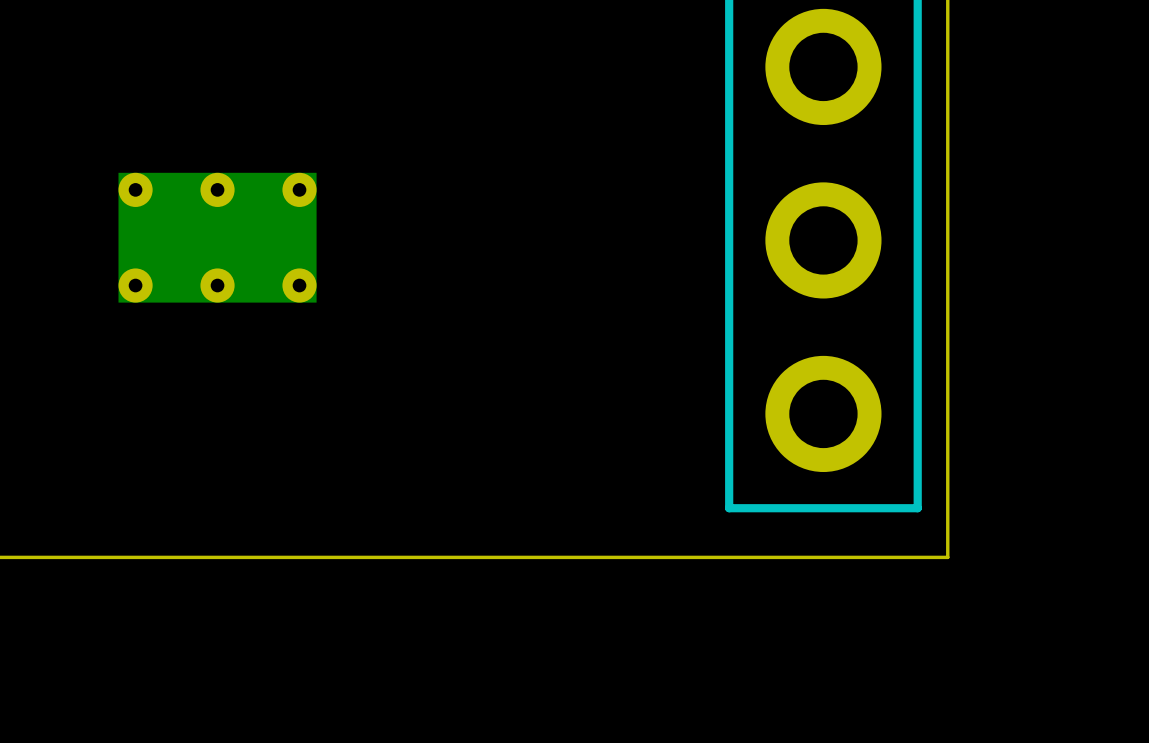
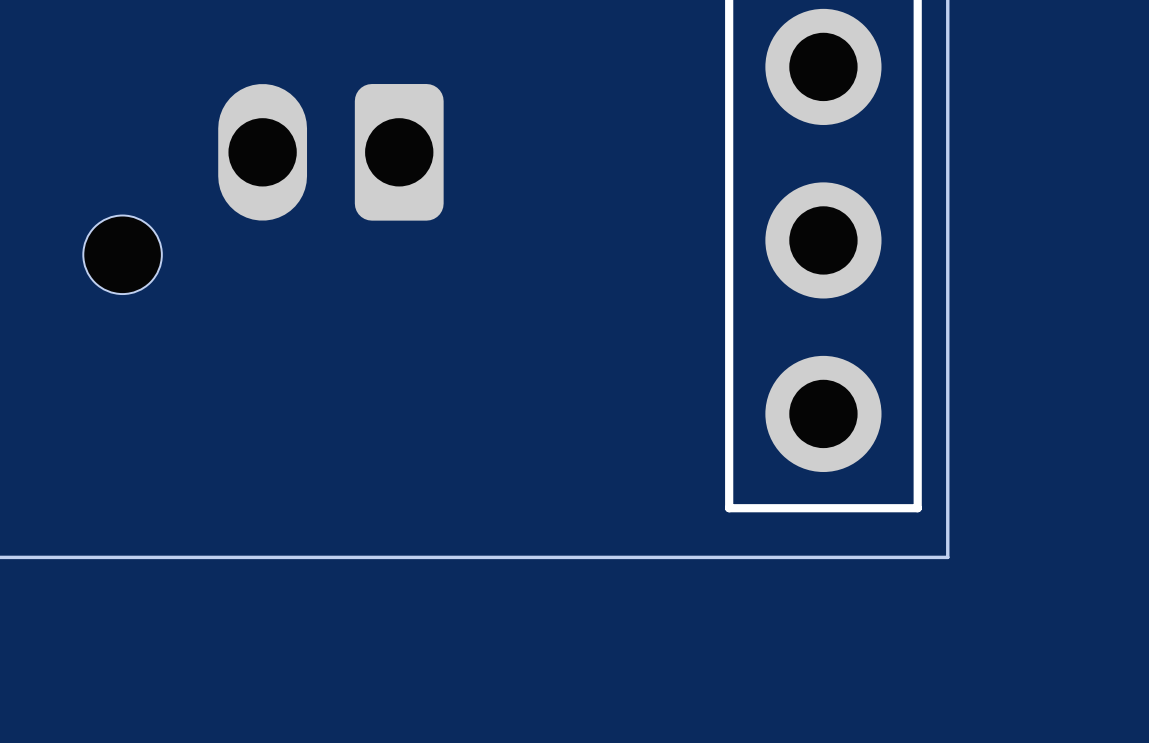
part footprint: [118, 172, 317, 303] -> [83, 84, 444, 295]

